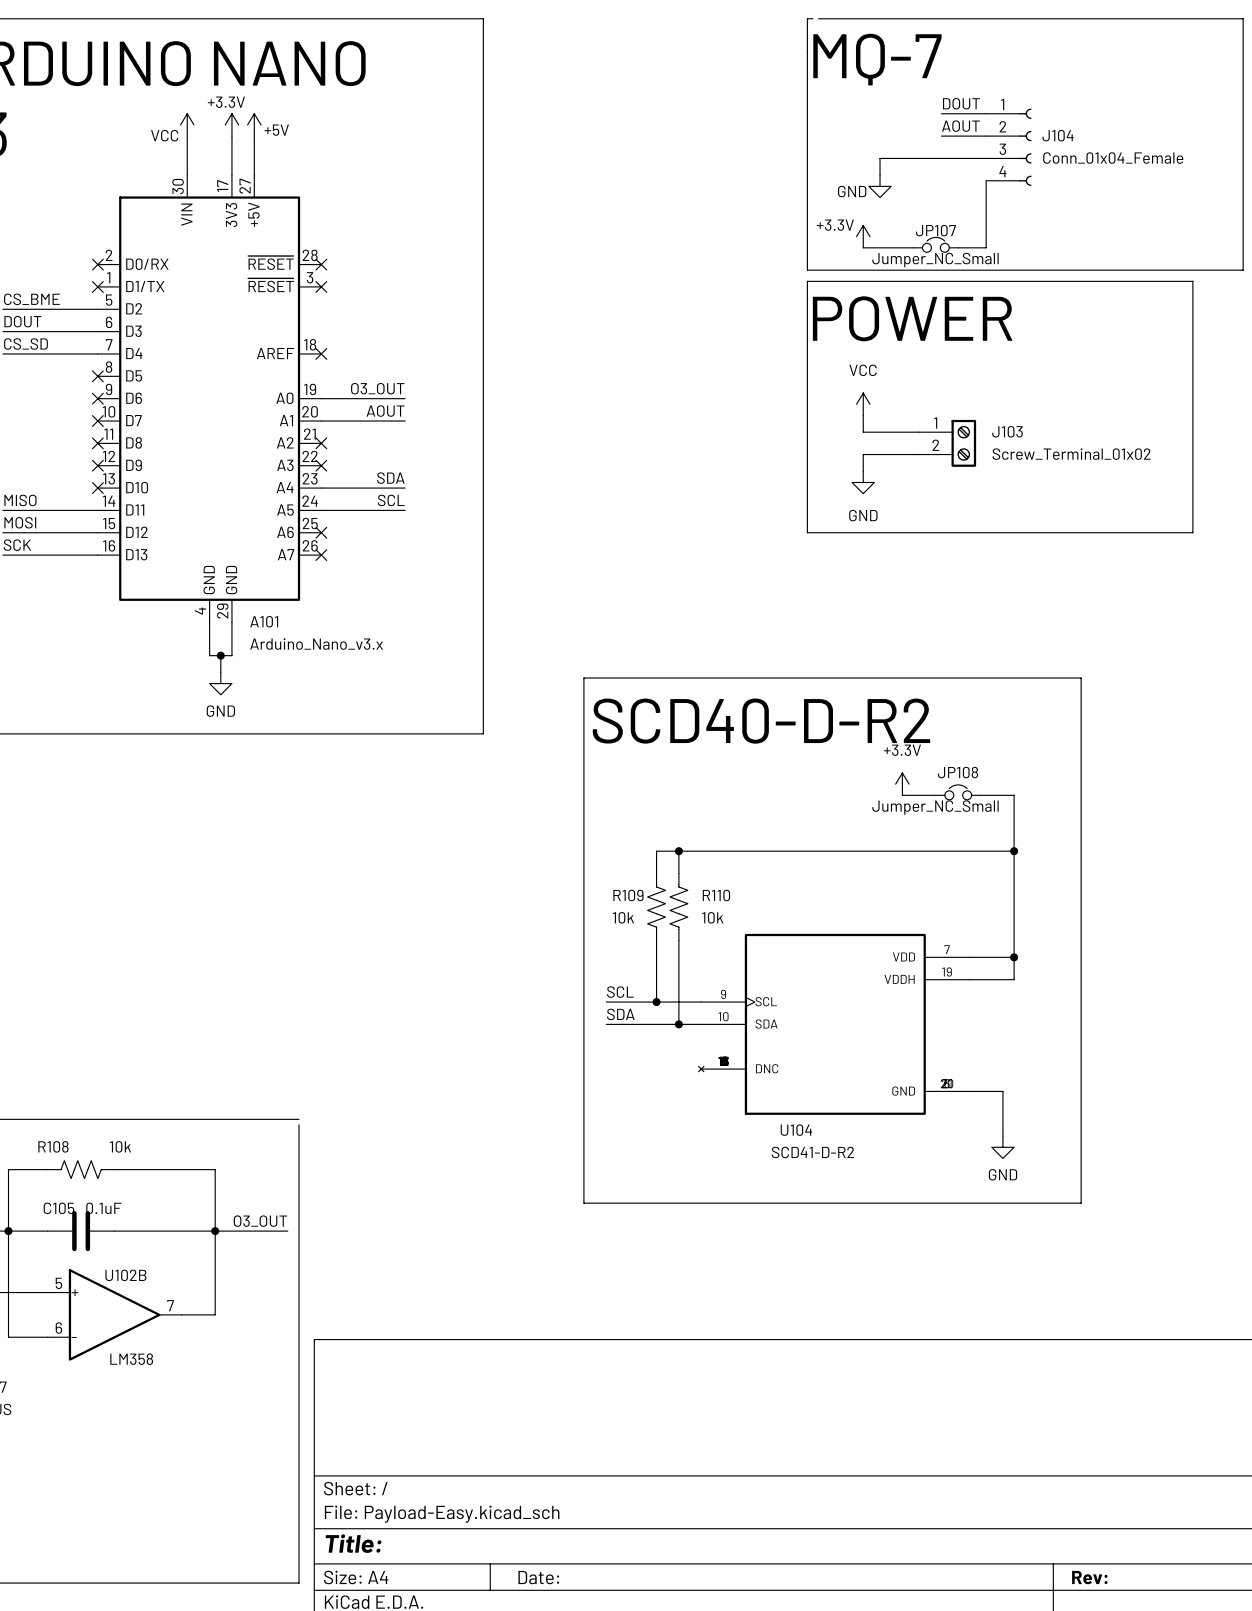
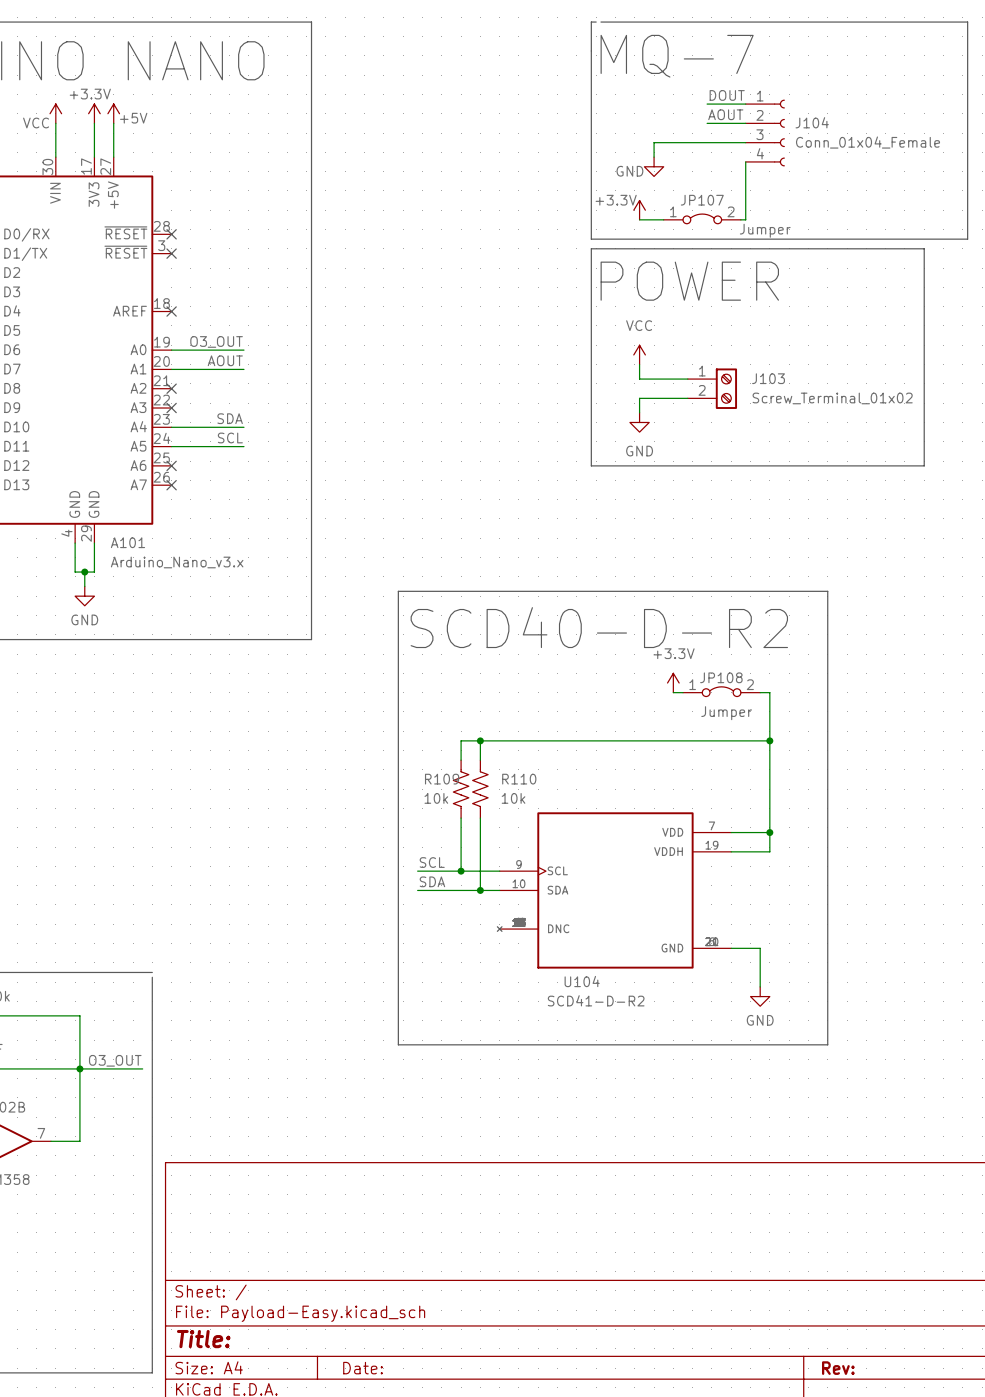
JP107 symbol: [913, 237, 959, 253] -> [663, 214, 741, 224]
JP107 value: Jumper_NC_Small (935, 260) -> Jumper (765, 230)
JP108 symbol: [935, 784, 981, 800] -> [683, 686, 761, 697]
JP108 value: Jumper_NC_Small (935, 807) -> Jumper (726, 713)

